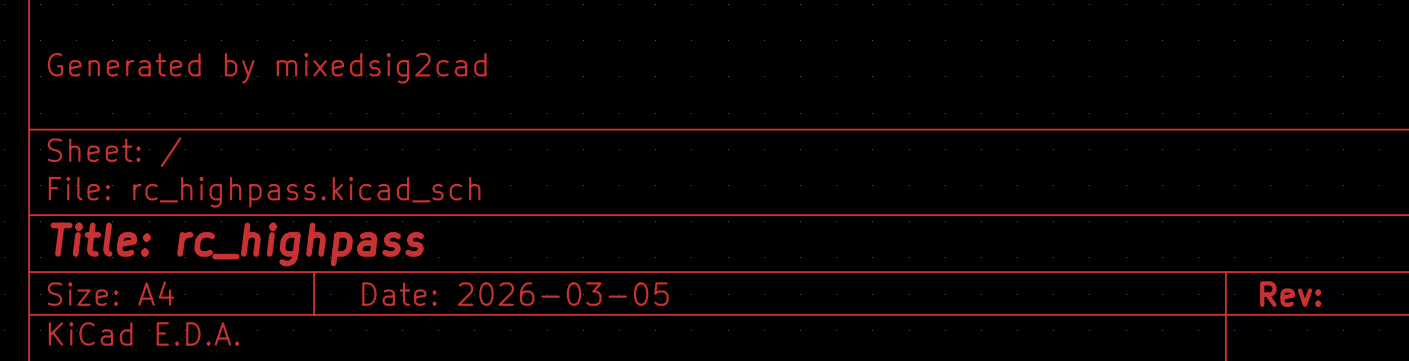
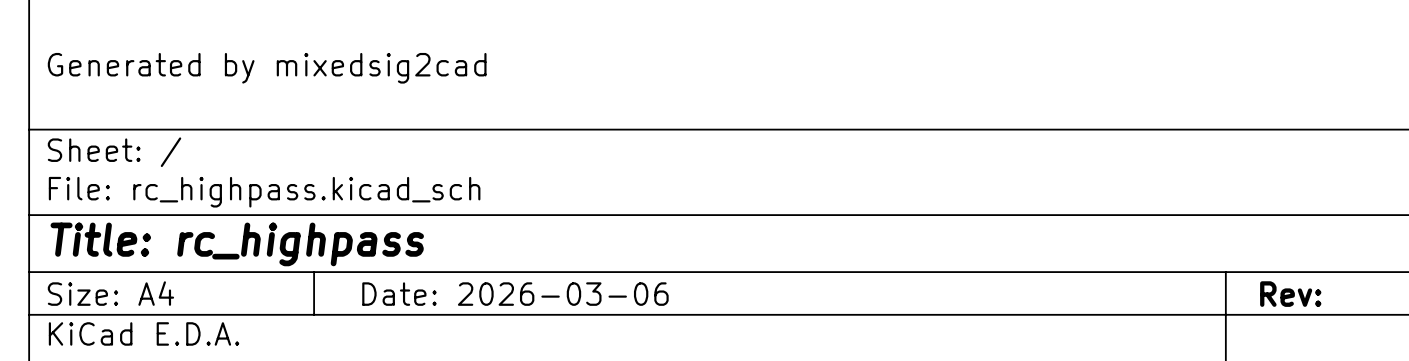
title block: Date: 2026-03-05 (515, 294) -> Date: 2026-03-06 (515, 294)

